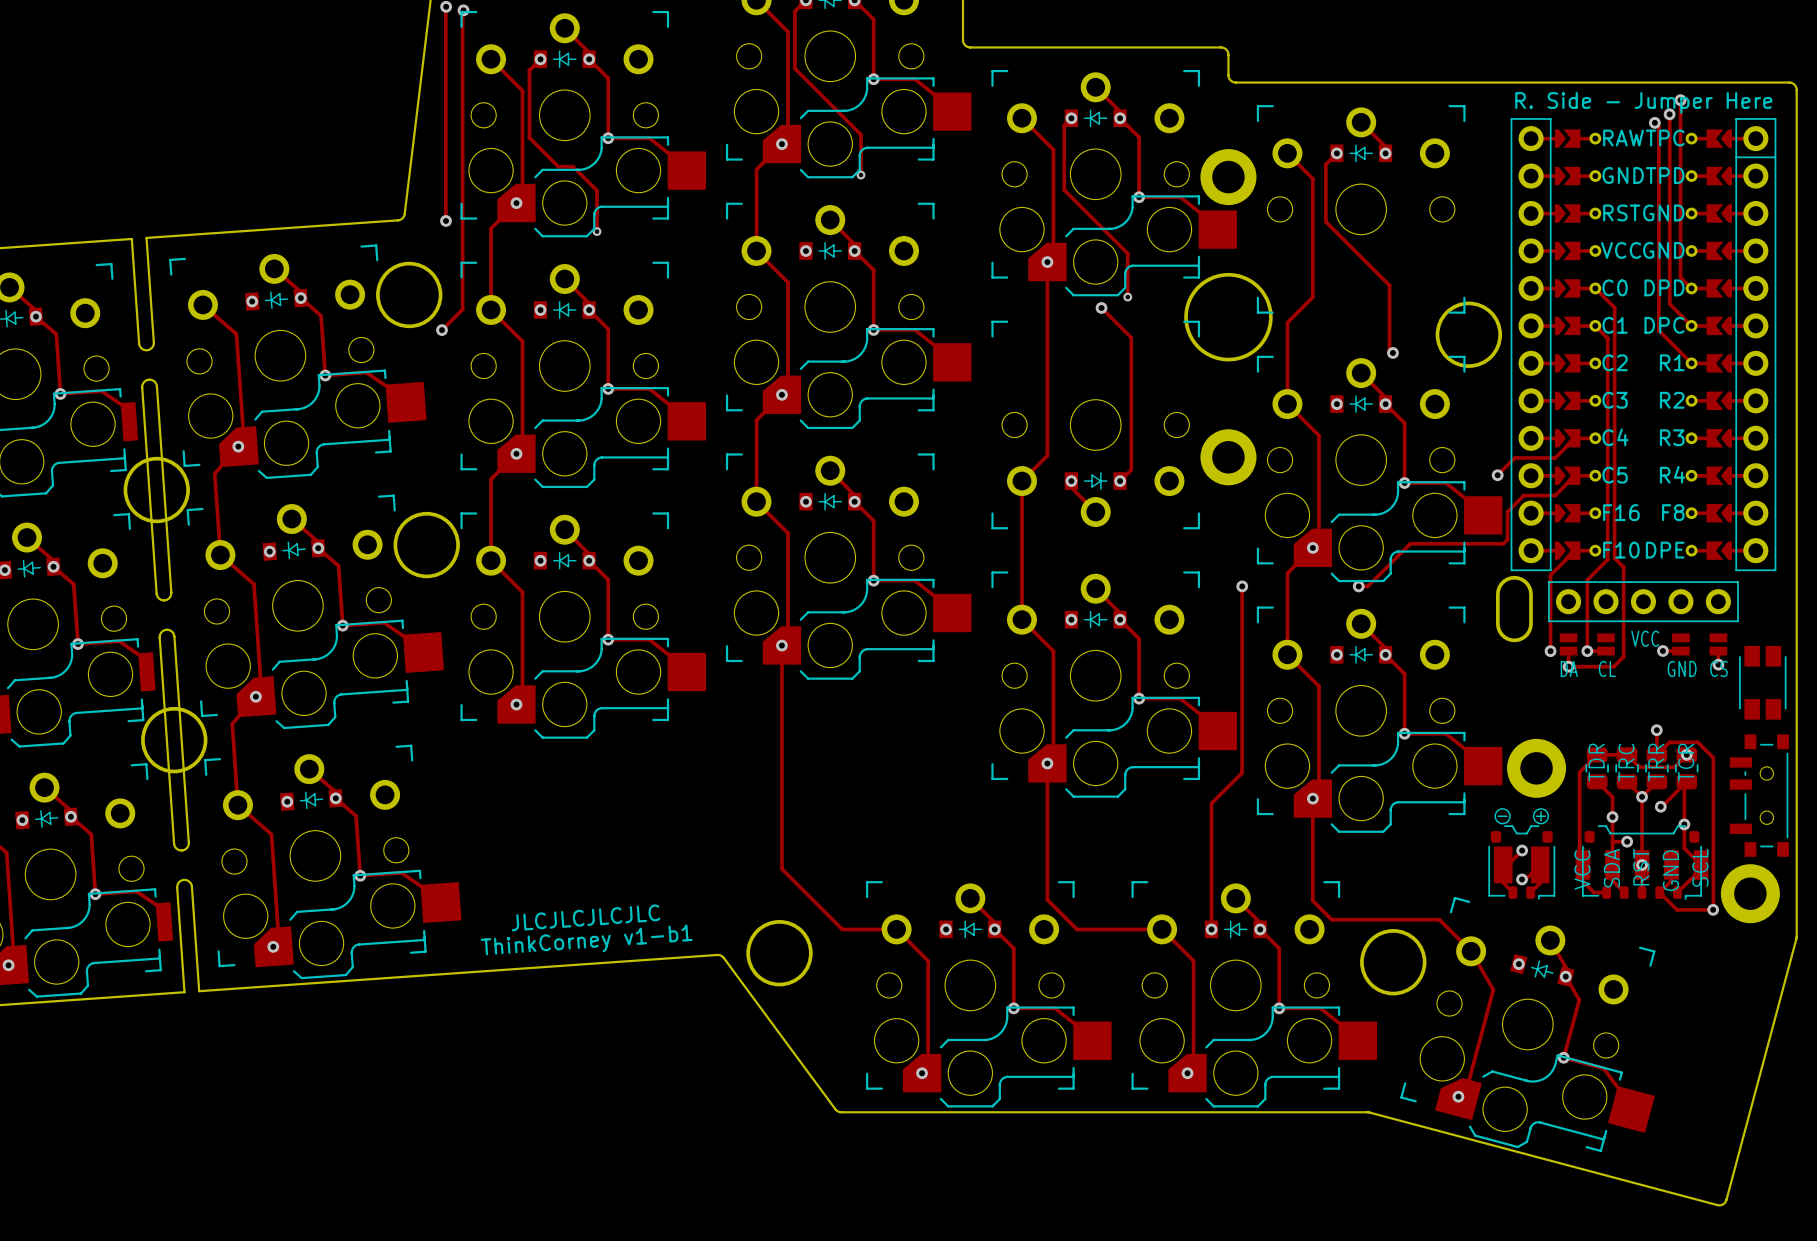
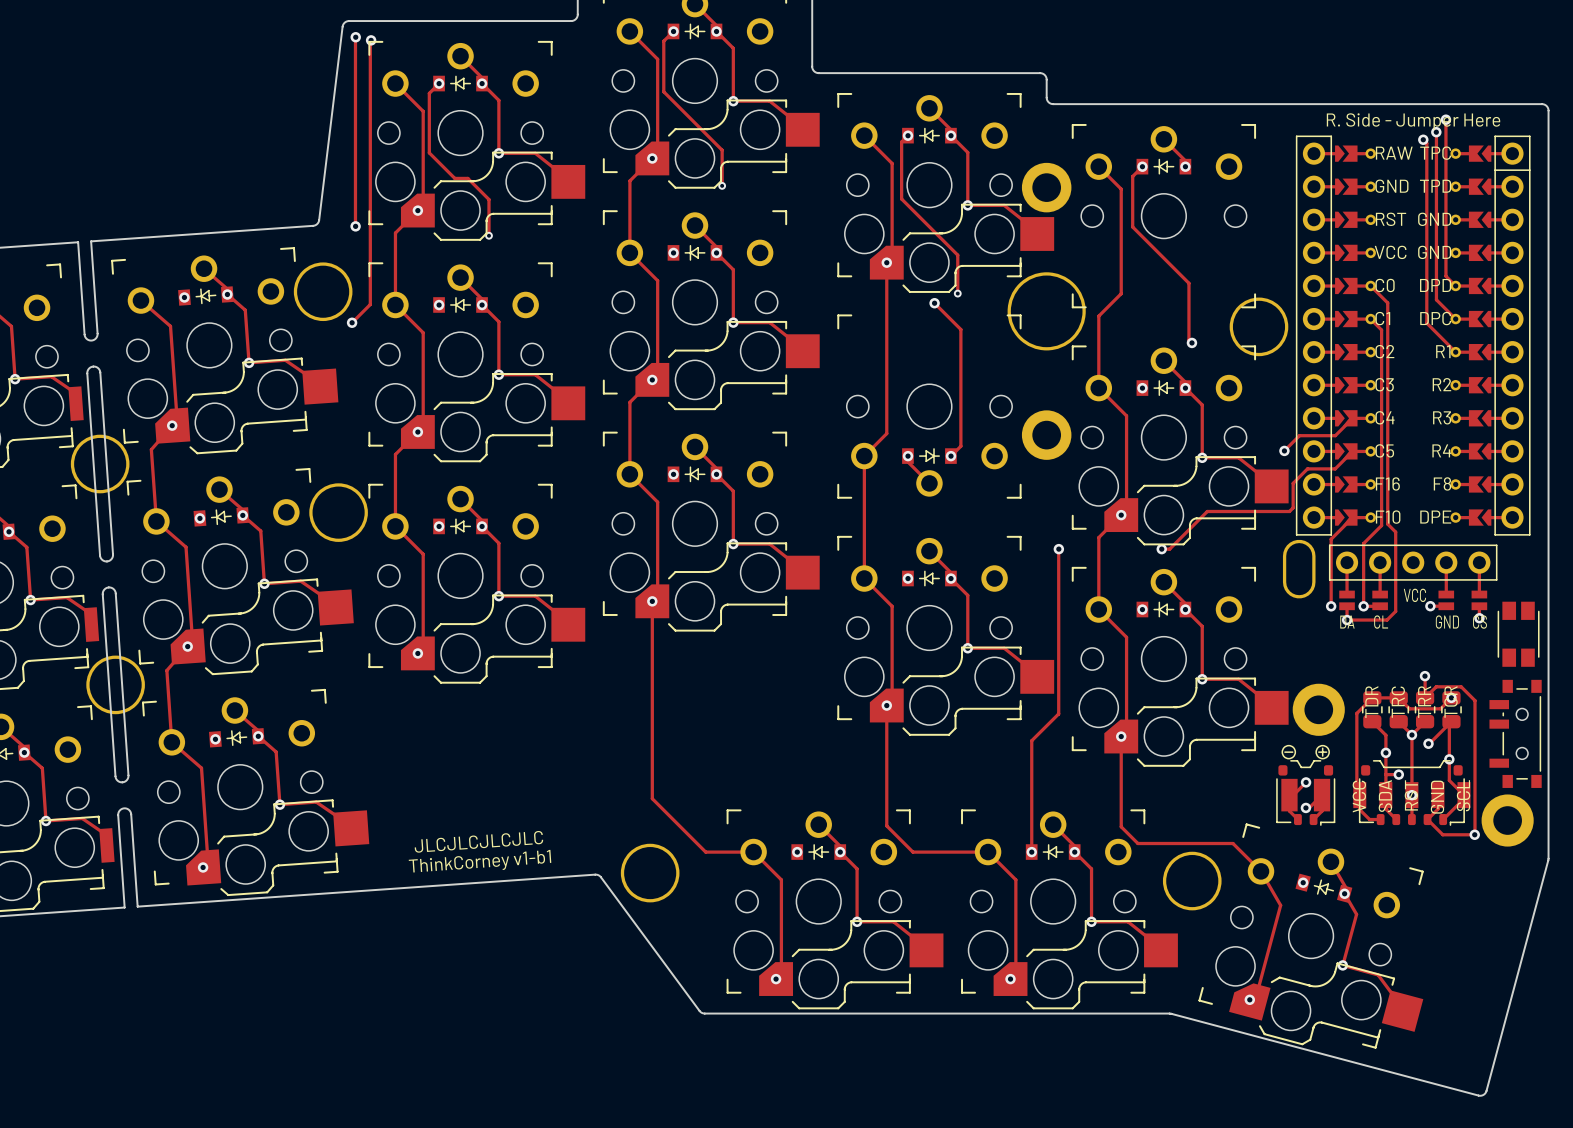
track: none -> (1347, 562) (1347, 594)
track: none -> (1380, 562) (1380, 594)
track: none -> (1446, 562) (1446, 594)
track: none -> (1479, 562) (1479, 594)

